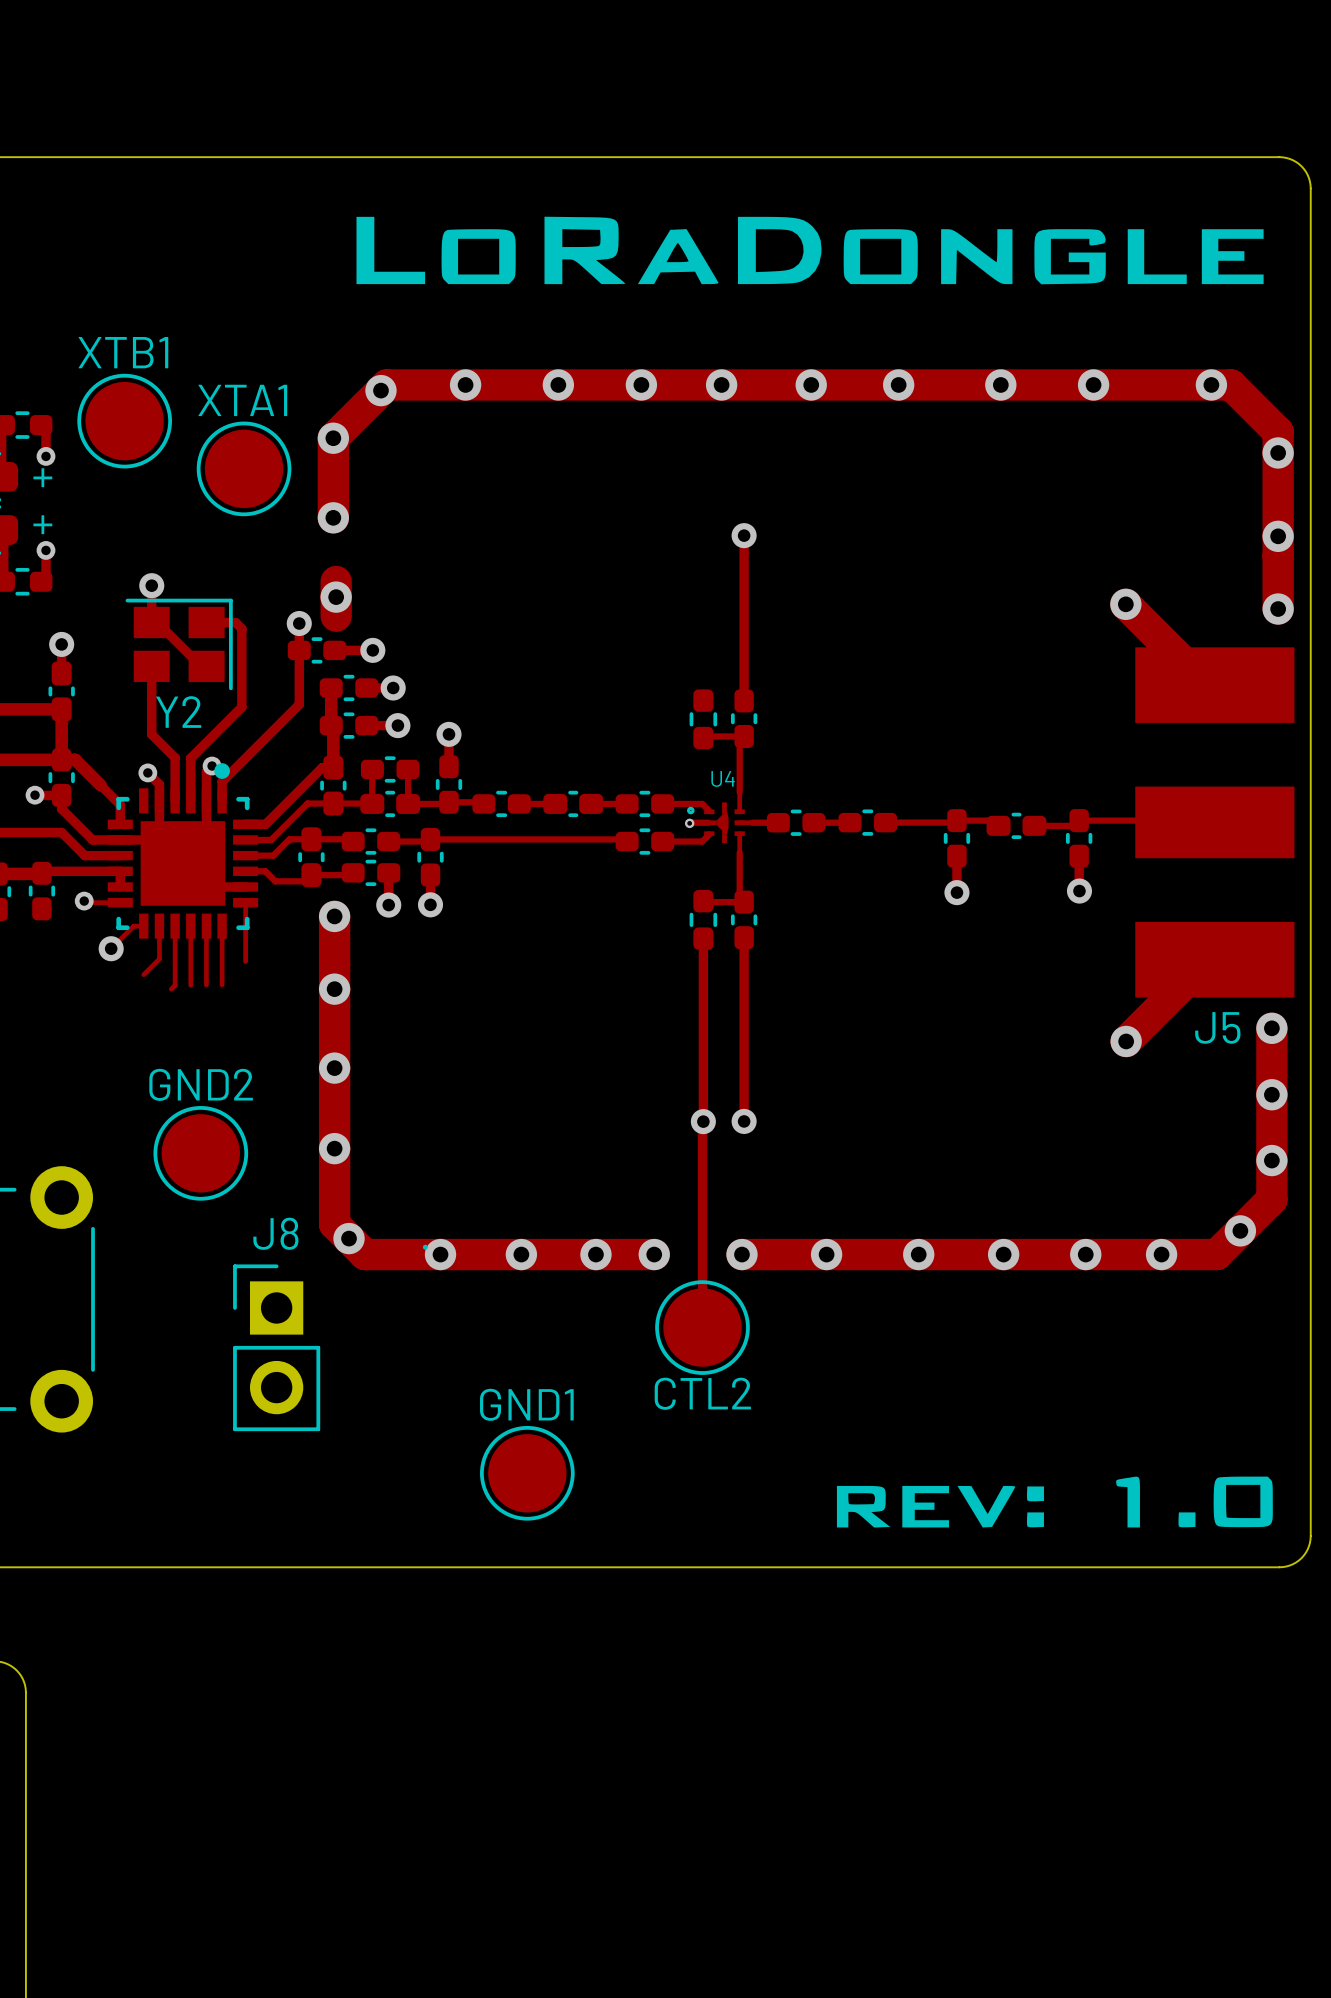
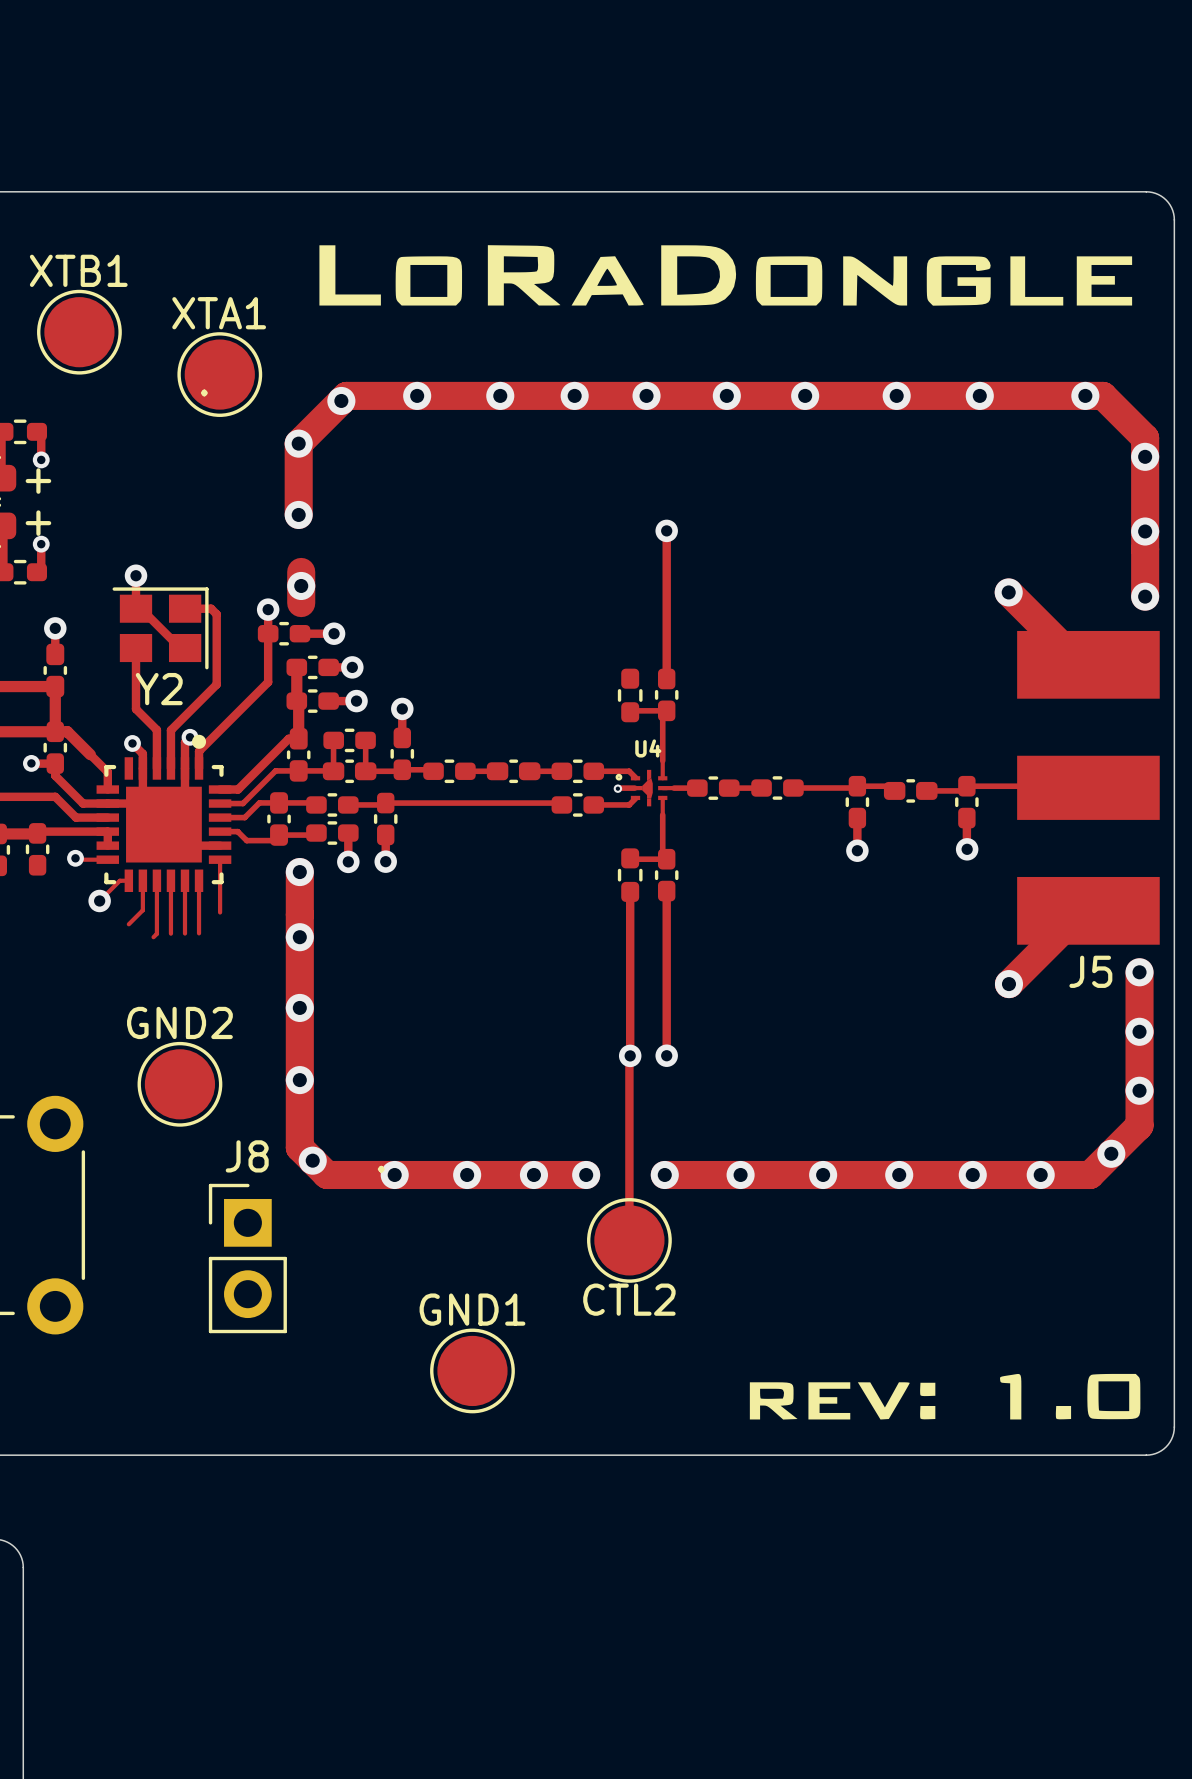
text: none -> . (204, 392)
XTB1 position: (124, 421) -> (79, 332)
XTA1 position: (244, 468) -> (219, 374)

